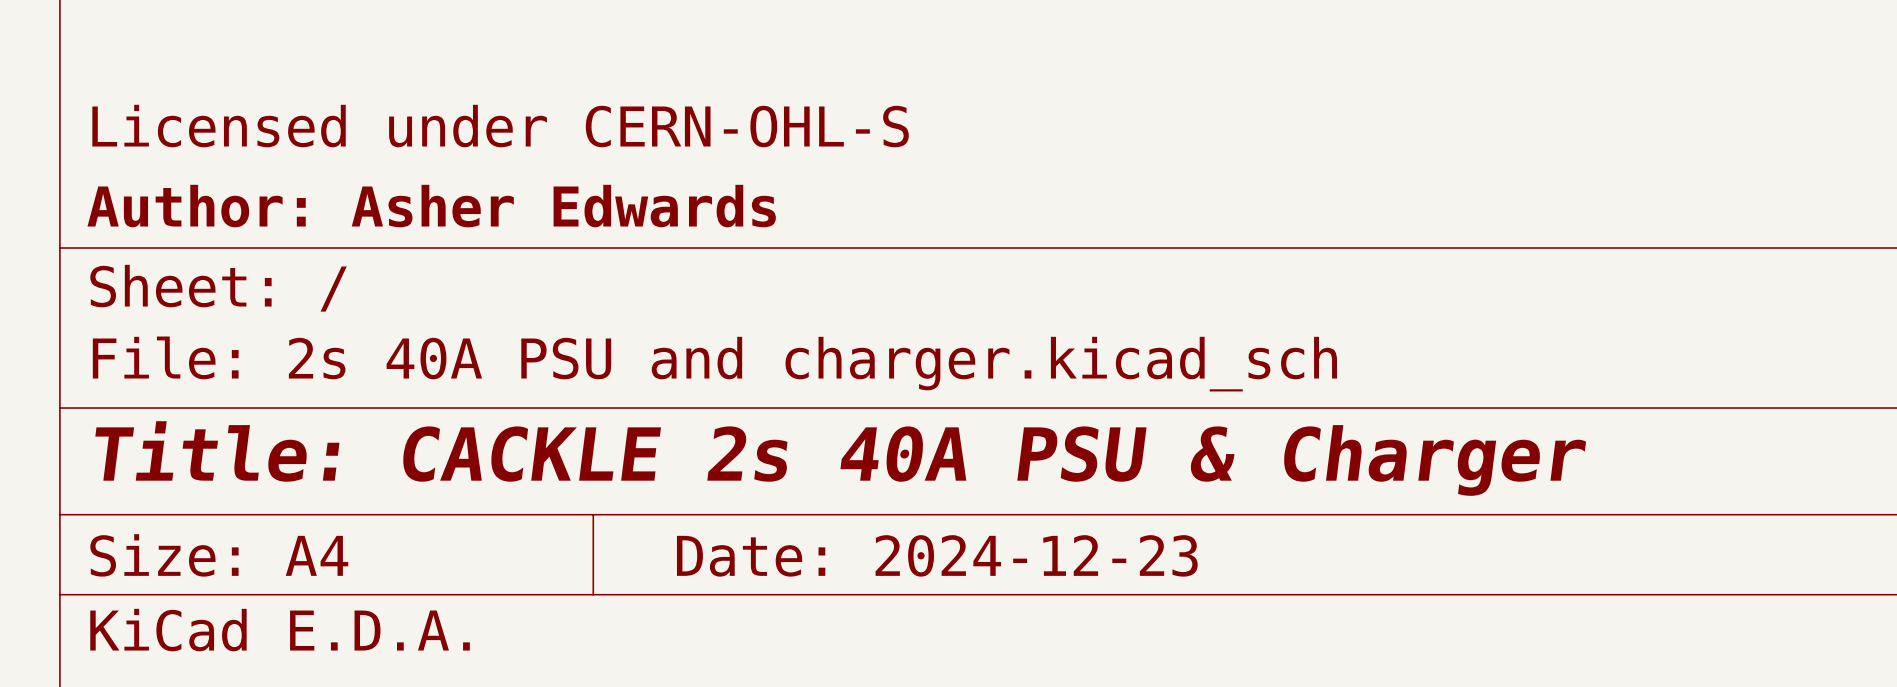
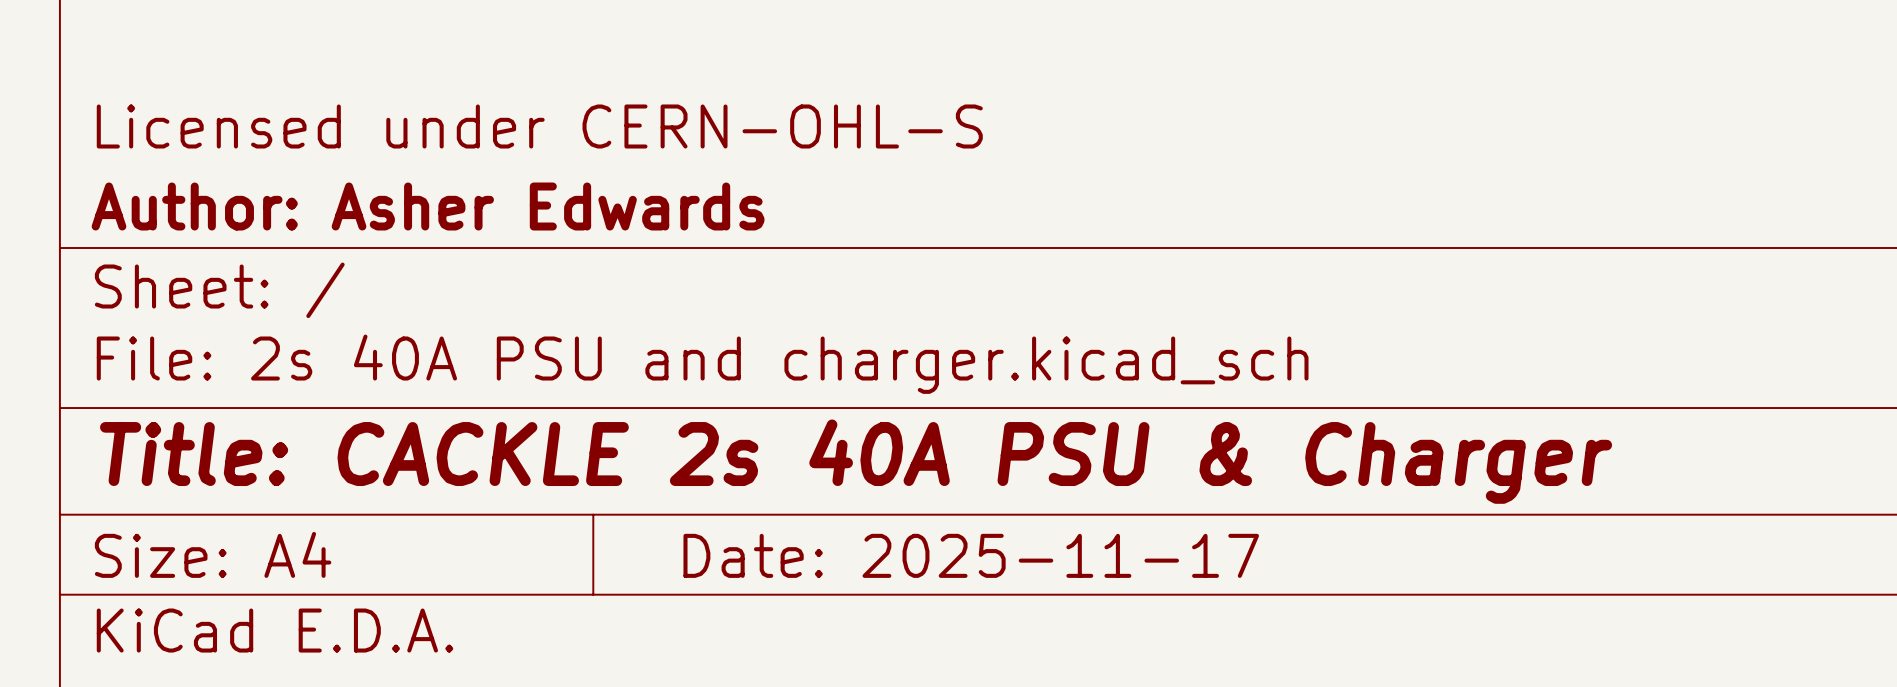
title block: Date: 2024-12-23 (937, 555) -> Date: 2025-11-17 (971, 555)

